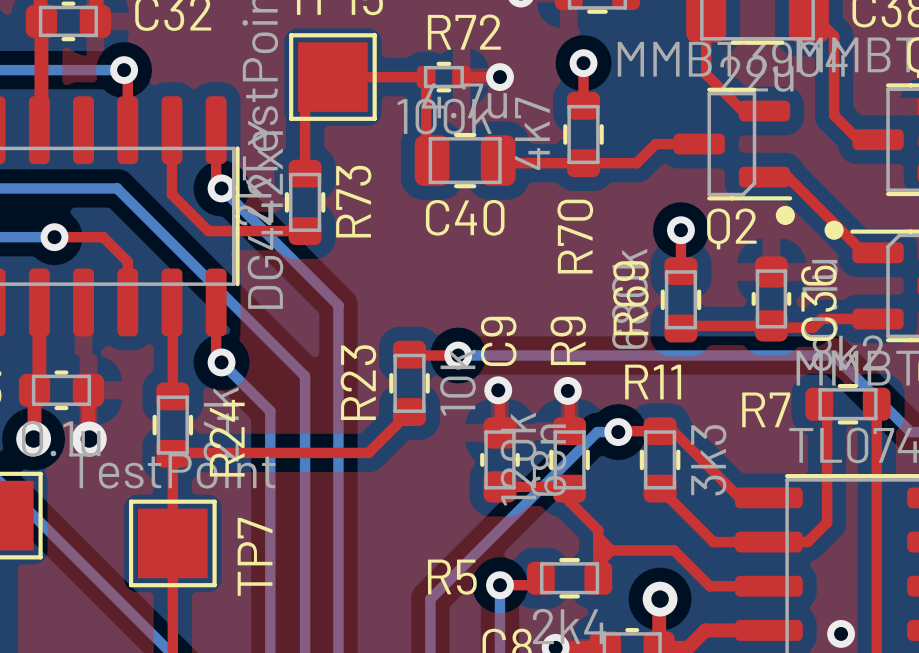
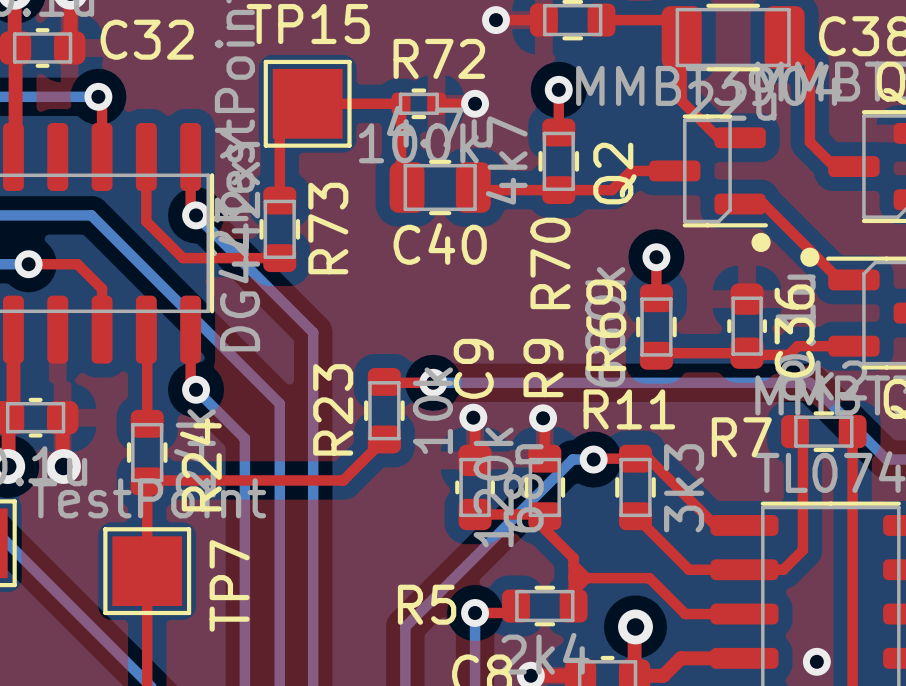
Q2 name rotation: 0° (731, 228) -> 90° counterclockwise (614, 173)
Q2 name position: Q2 (731, 228) -> Q2 (614, 173)

